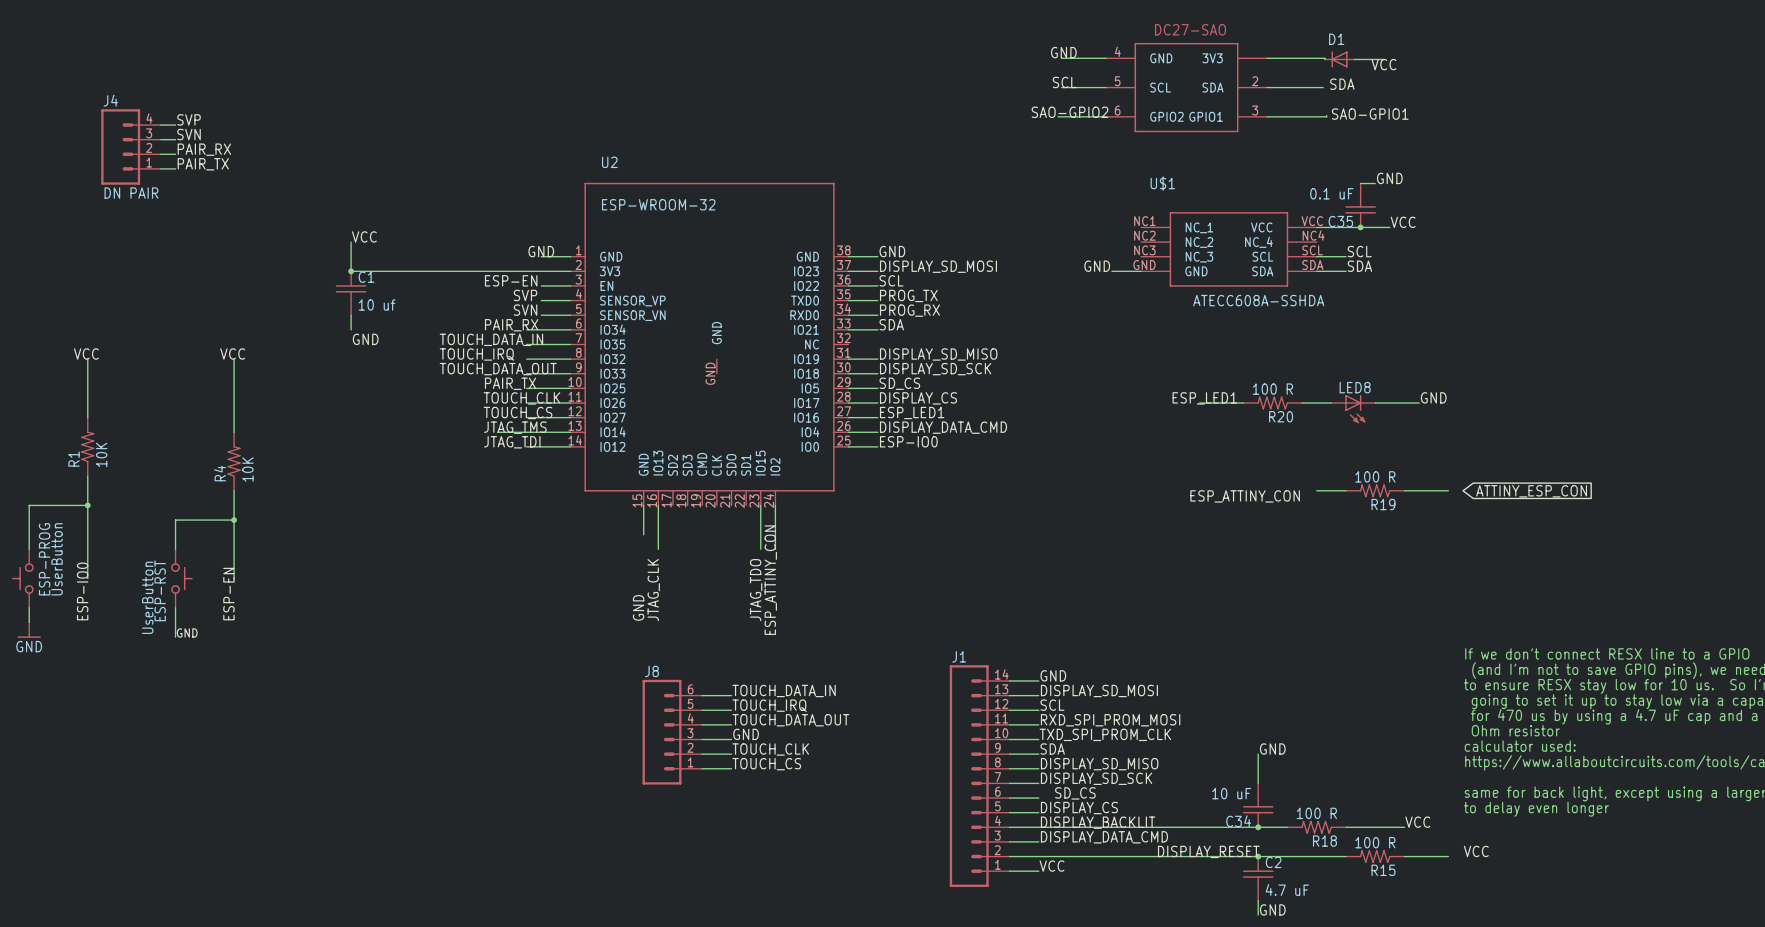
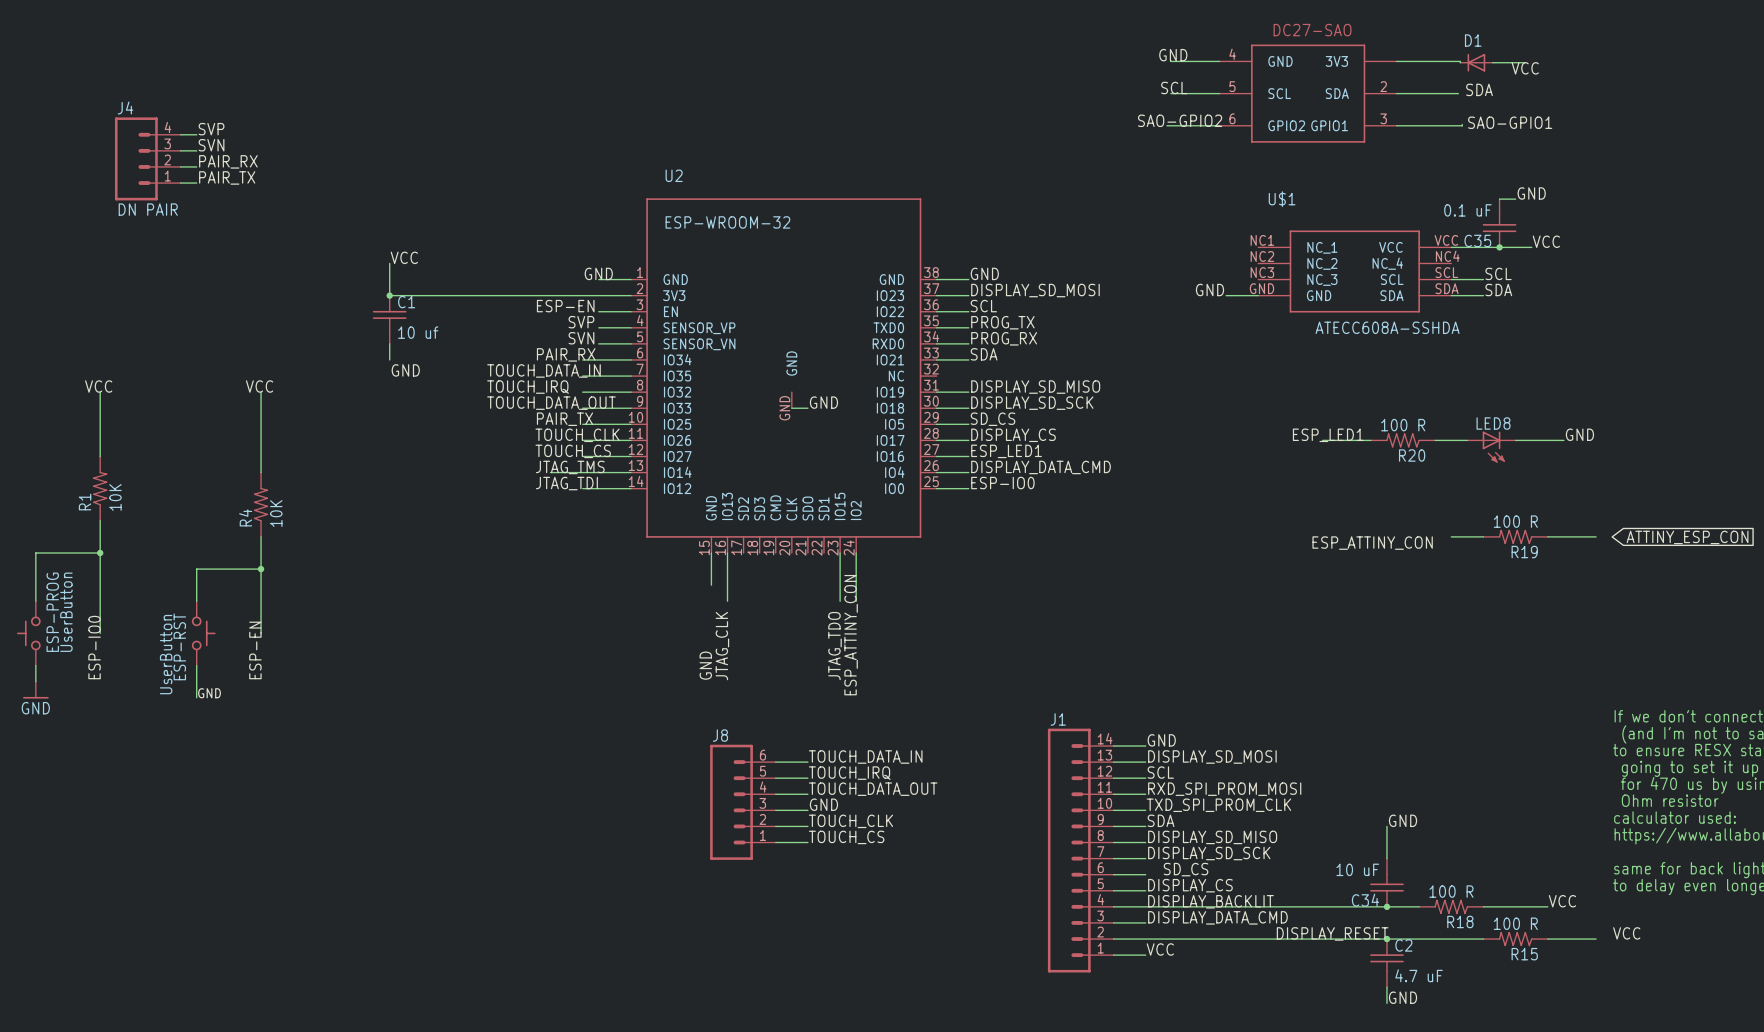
label: none -> GND (823, 402)
wire: none -> (791, 408) (807, 408)

